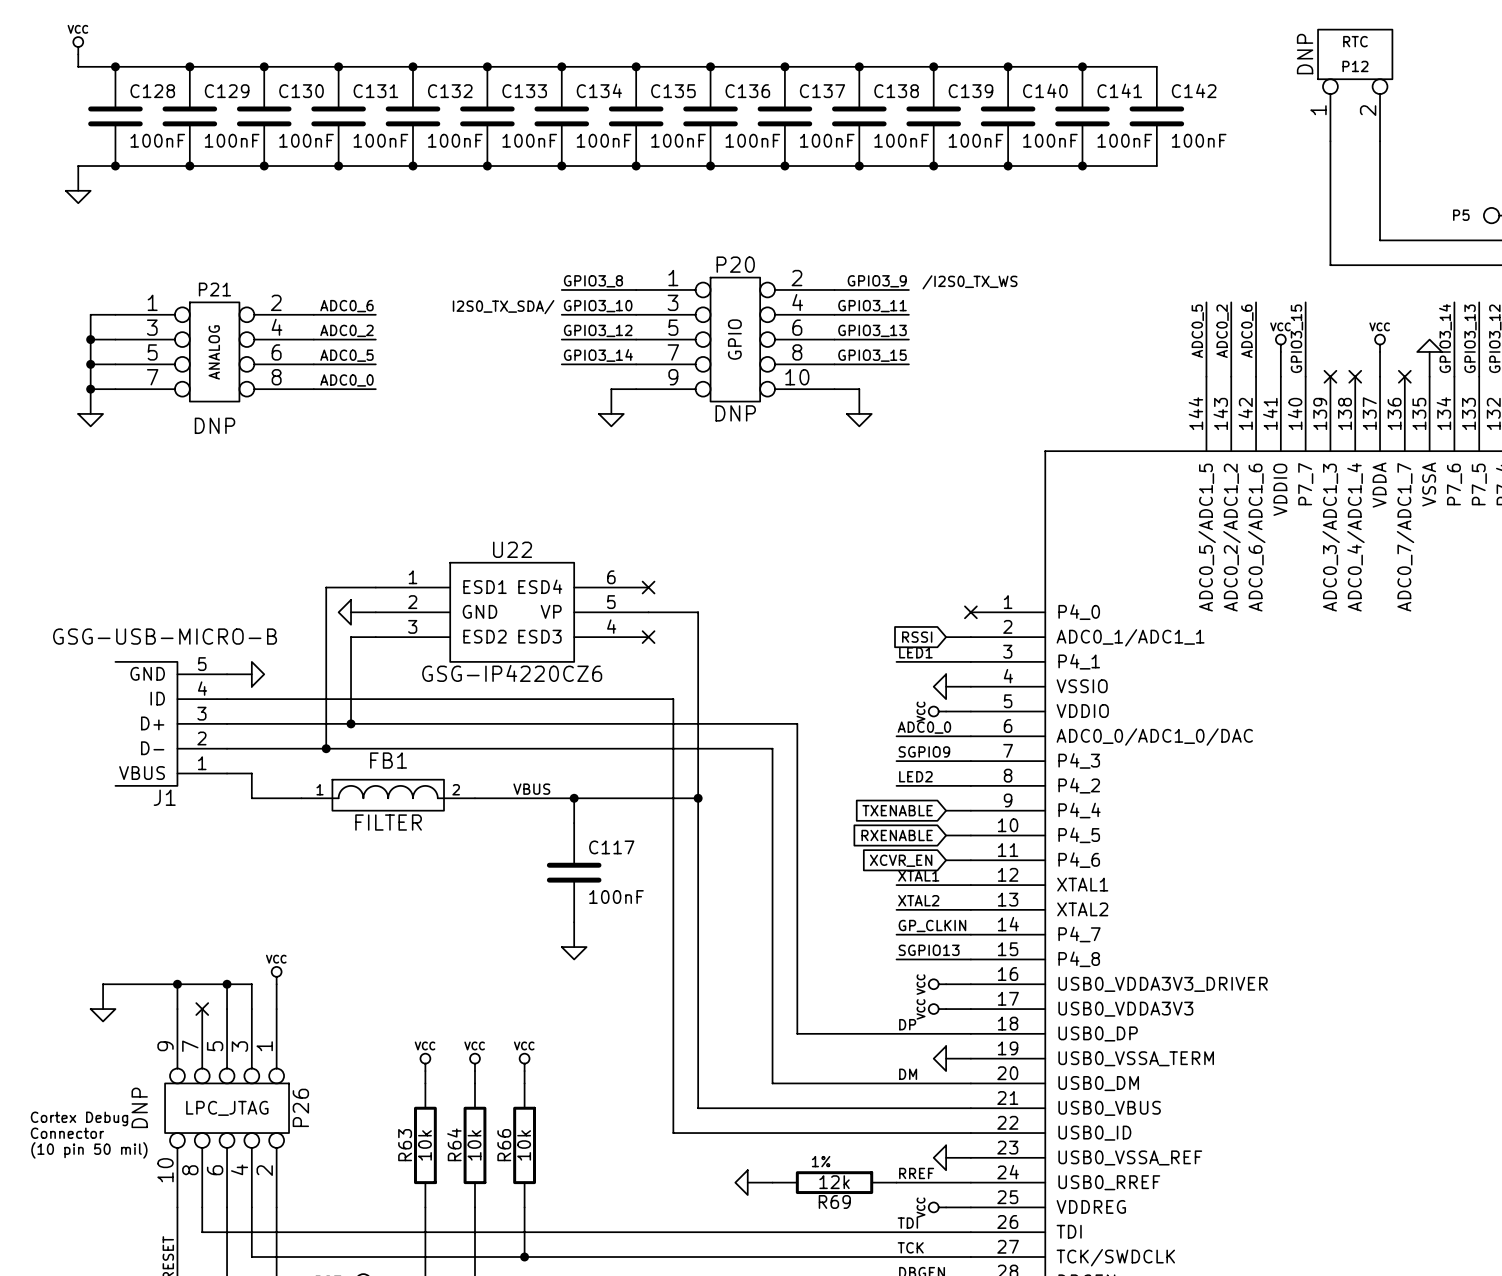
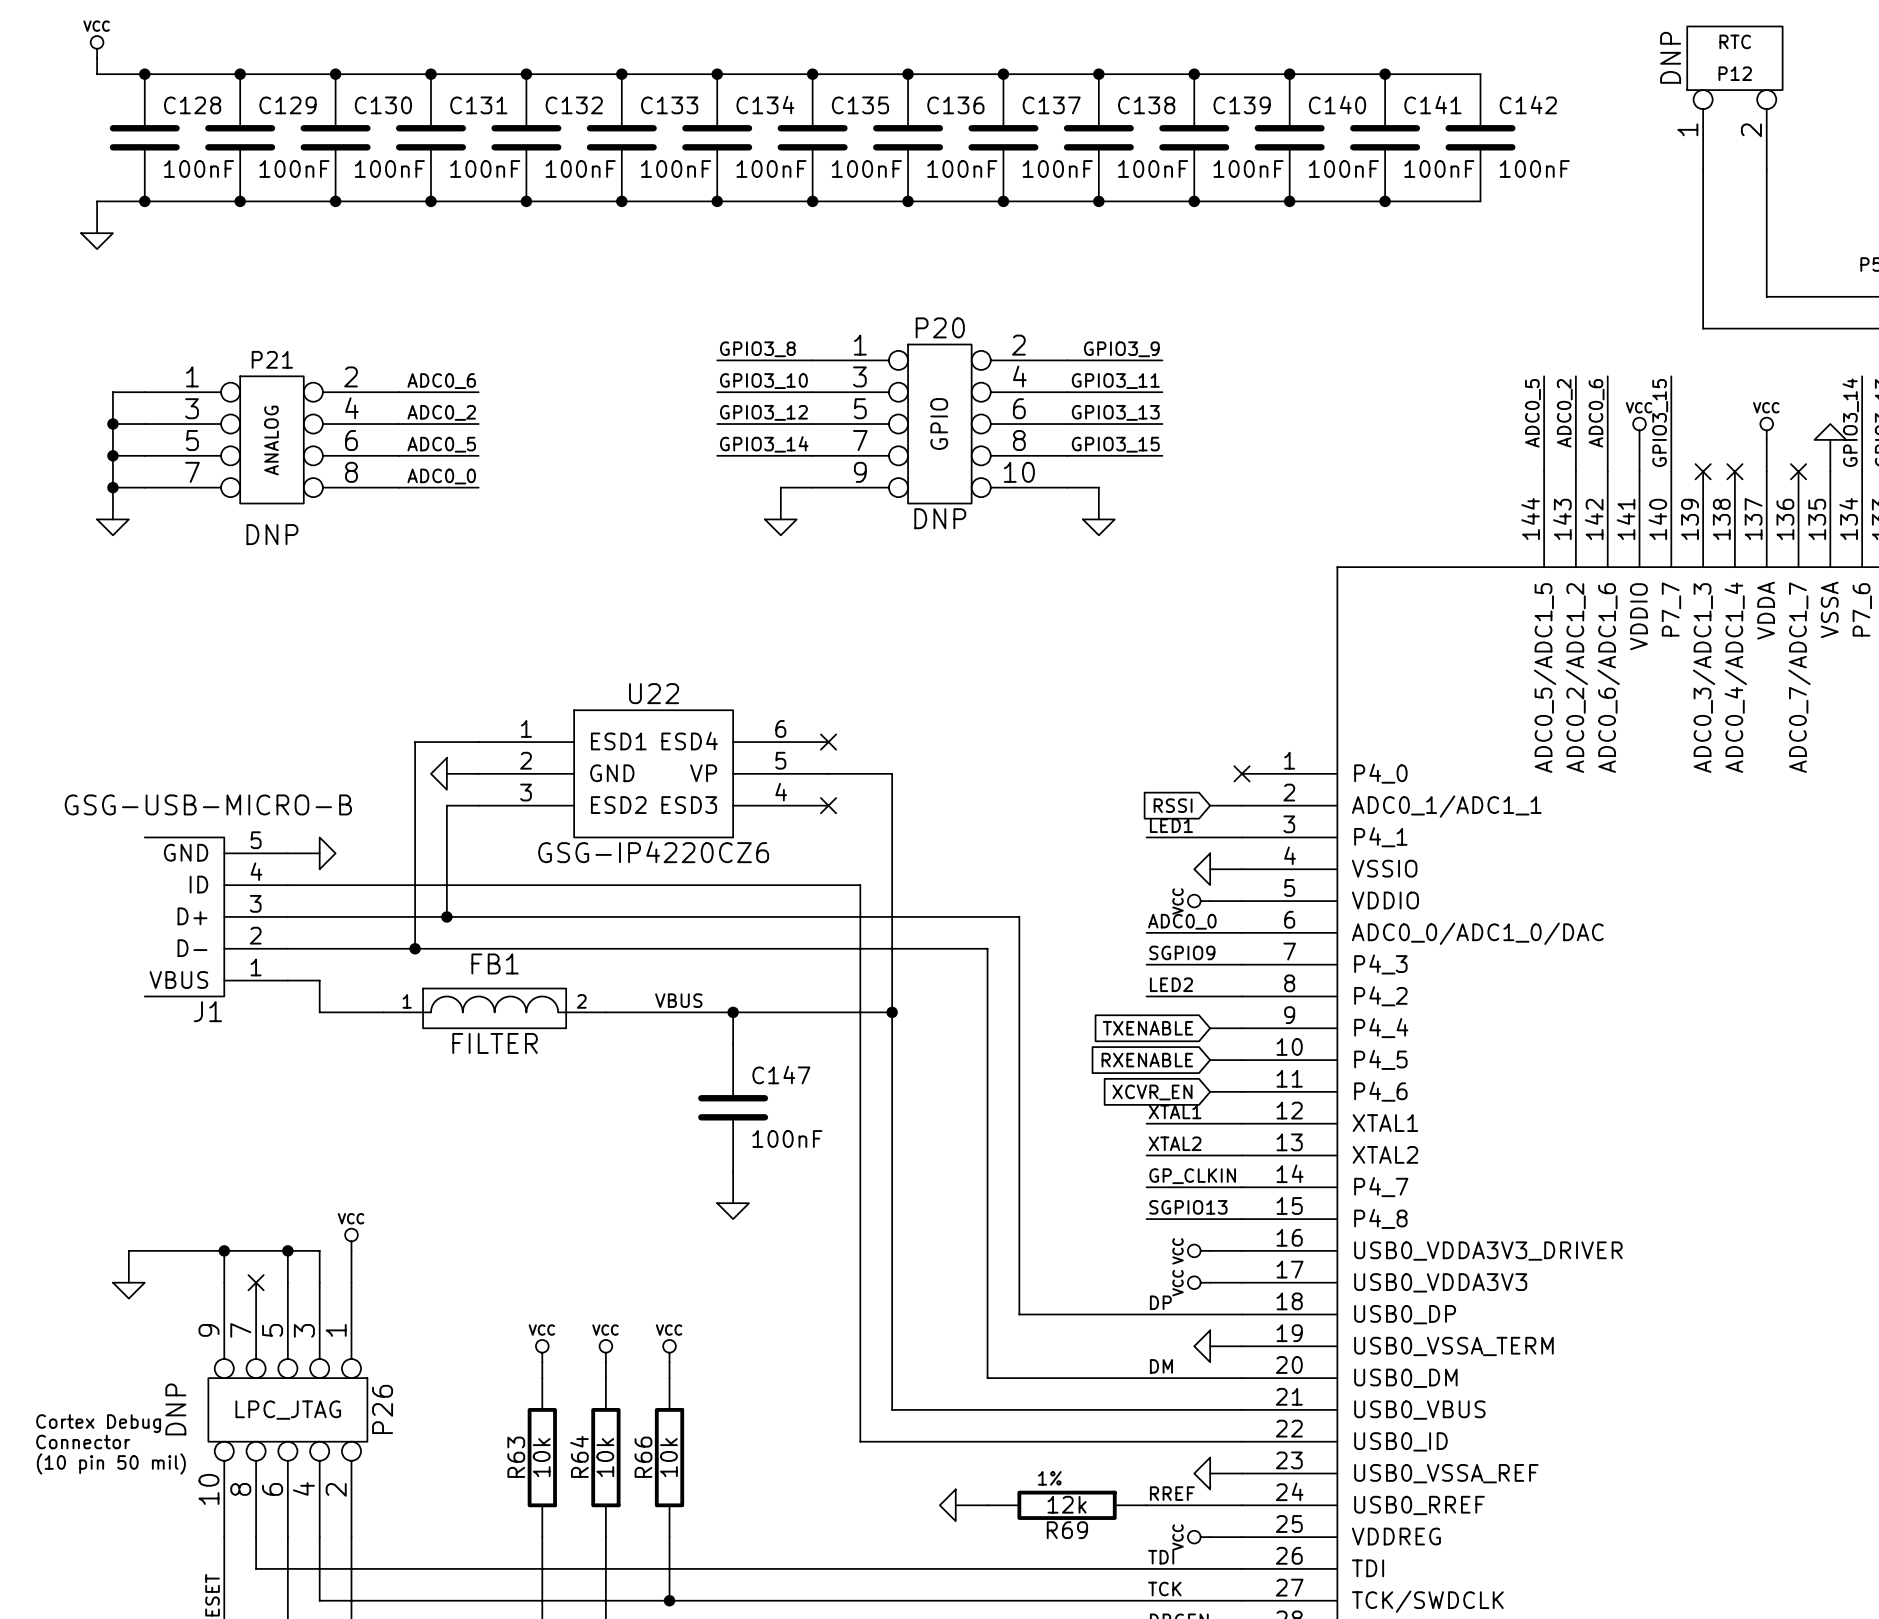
text: /I2S0_TX_WS (969, 282) -> none
text: I2S0_TX_SDA/ (503, 307) -> none
C117 name: C117 (611, 847) -> C147 (781, 1075)

